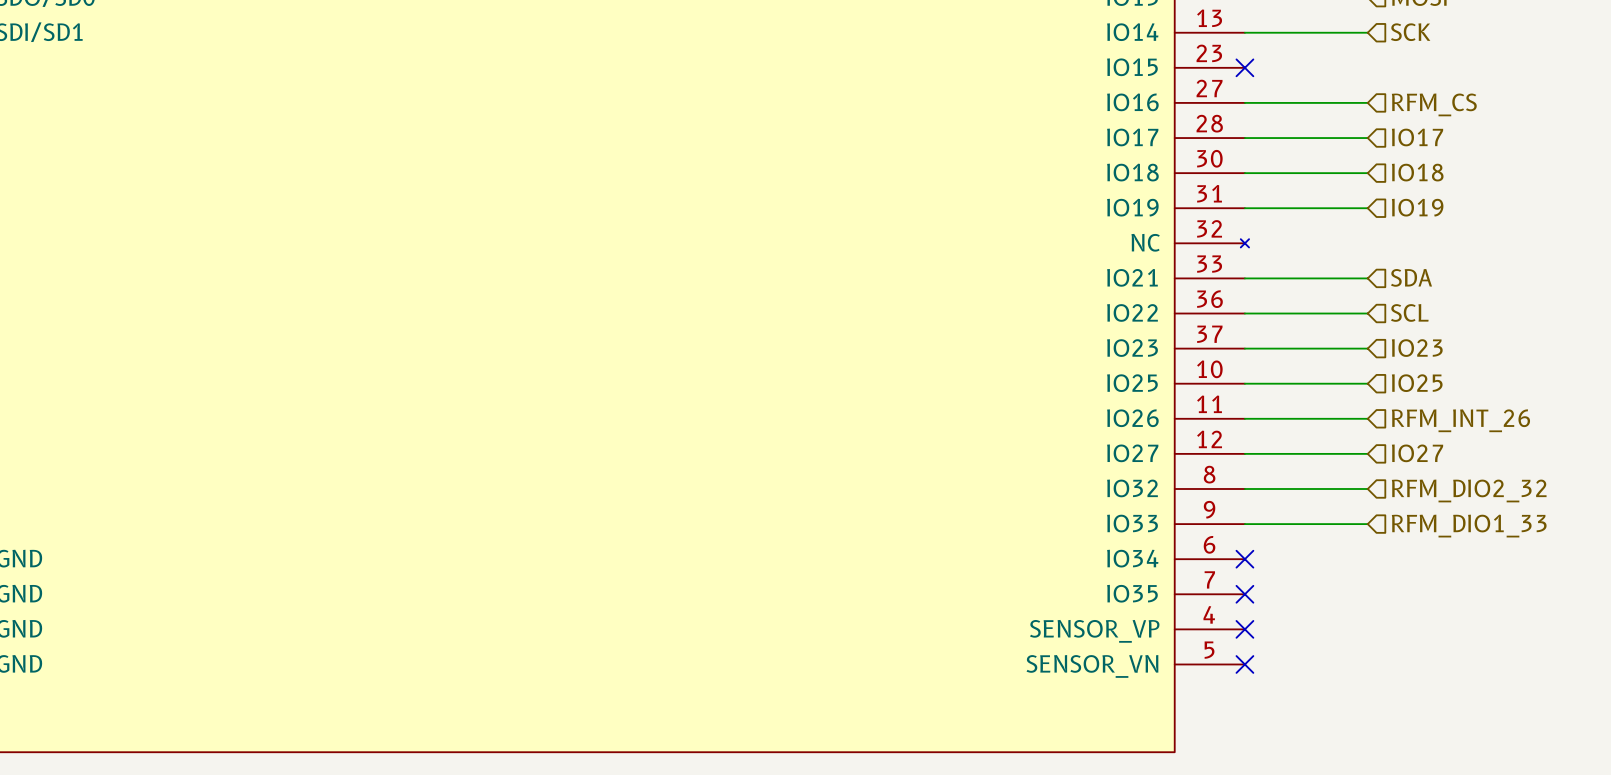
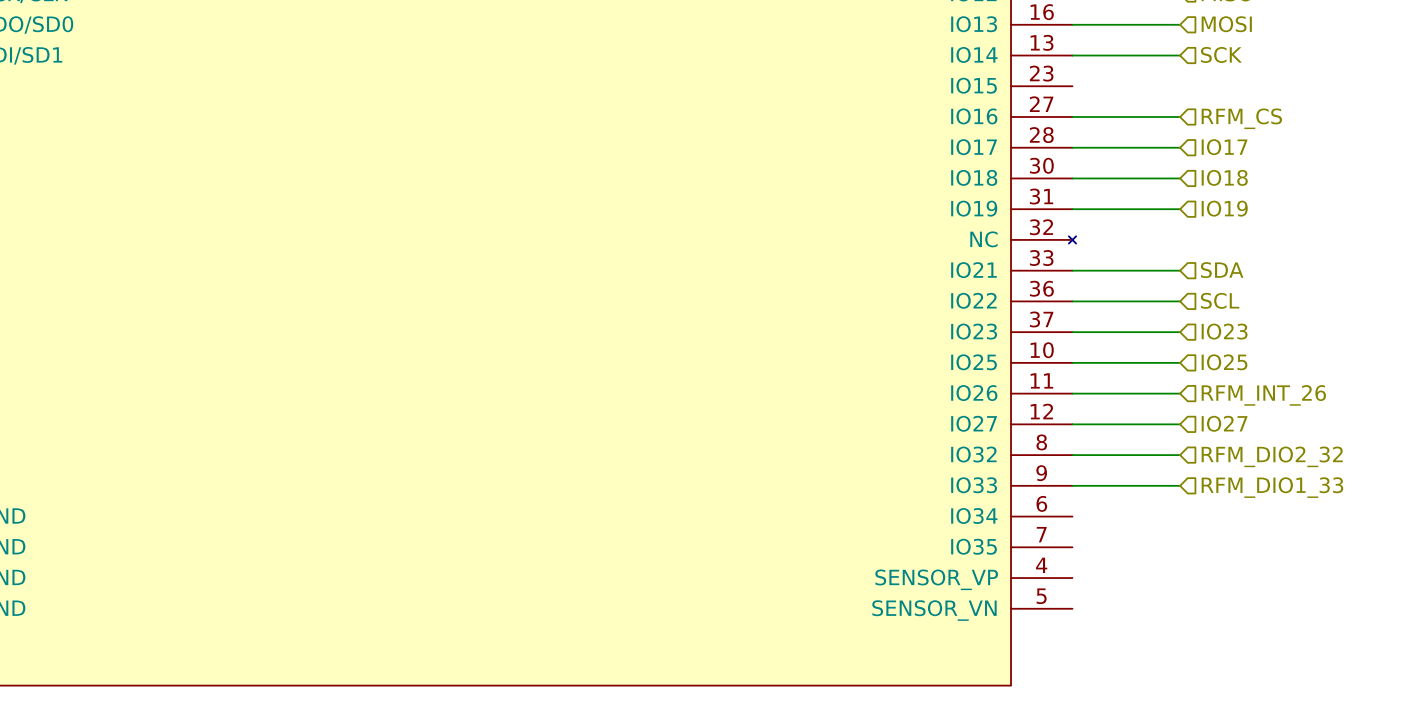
no-connect mark: (1244, 67) -> none
no-connect mark: (1244, 559) -> none
no-connect mark: (1244, 594) -> none
no-connect mark: (1244, 629) -> none
no-connect mark: (1244, 664) -> none

